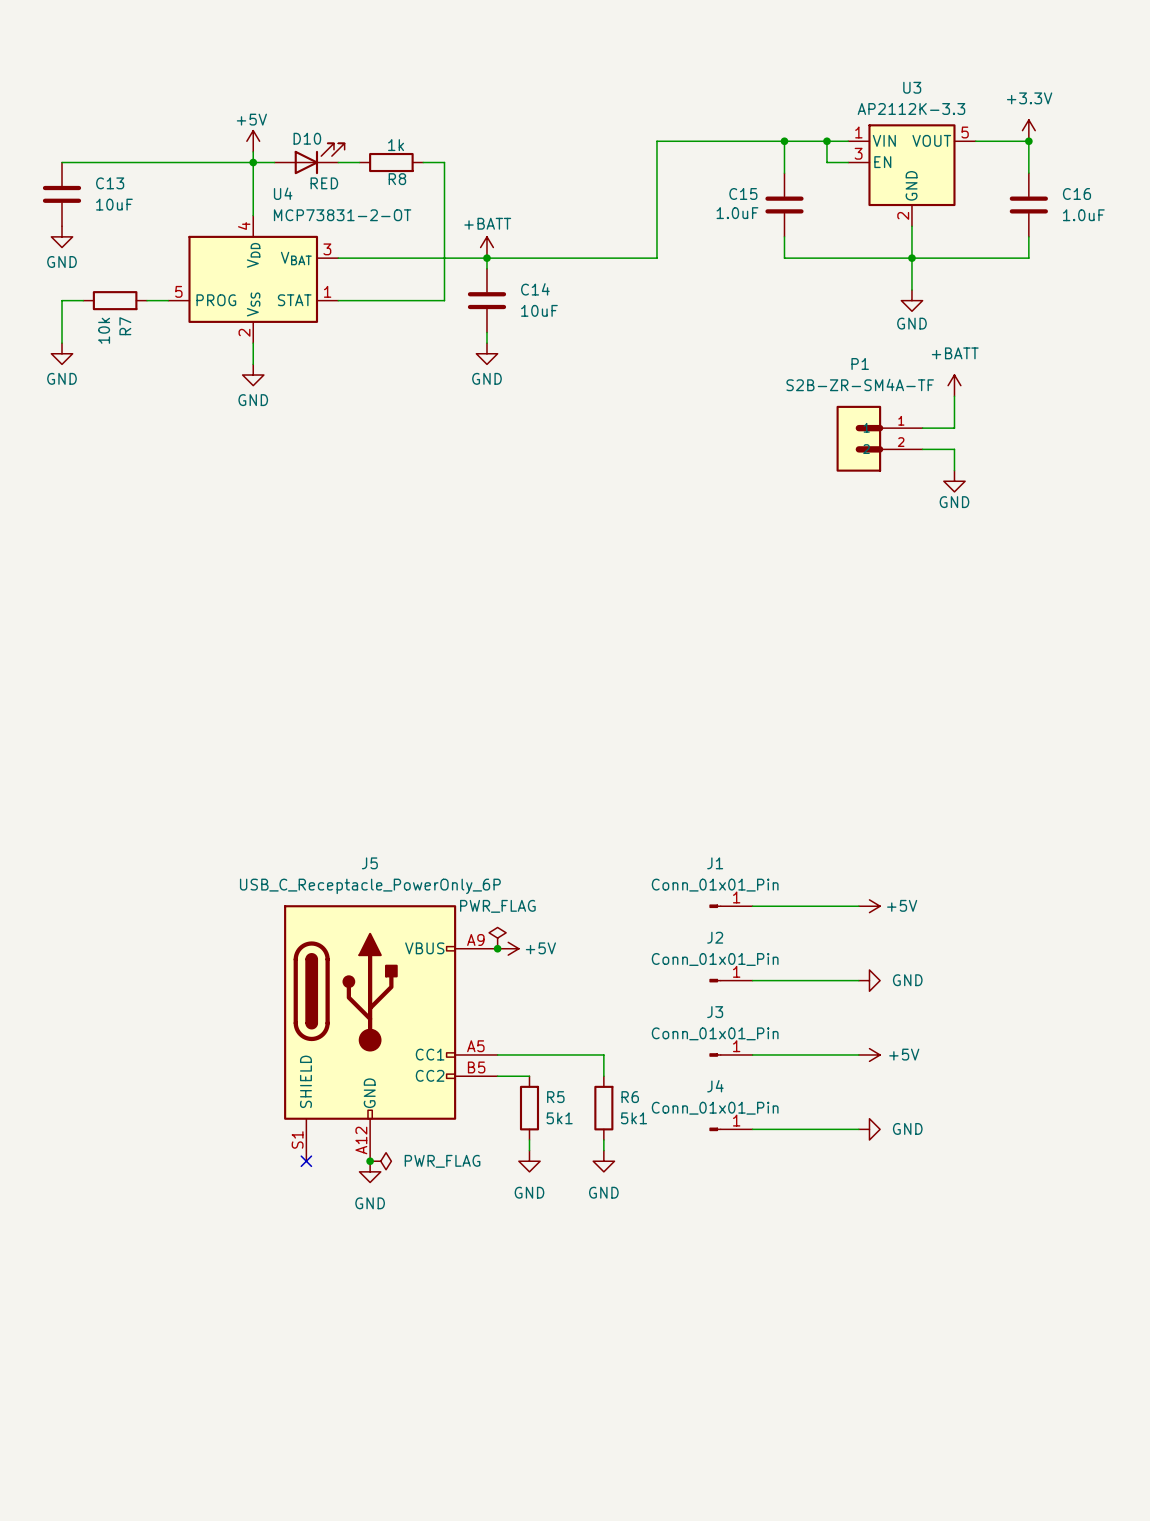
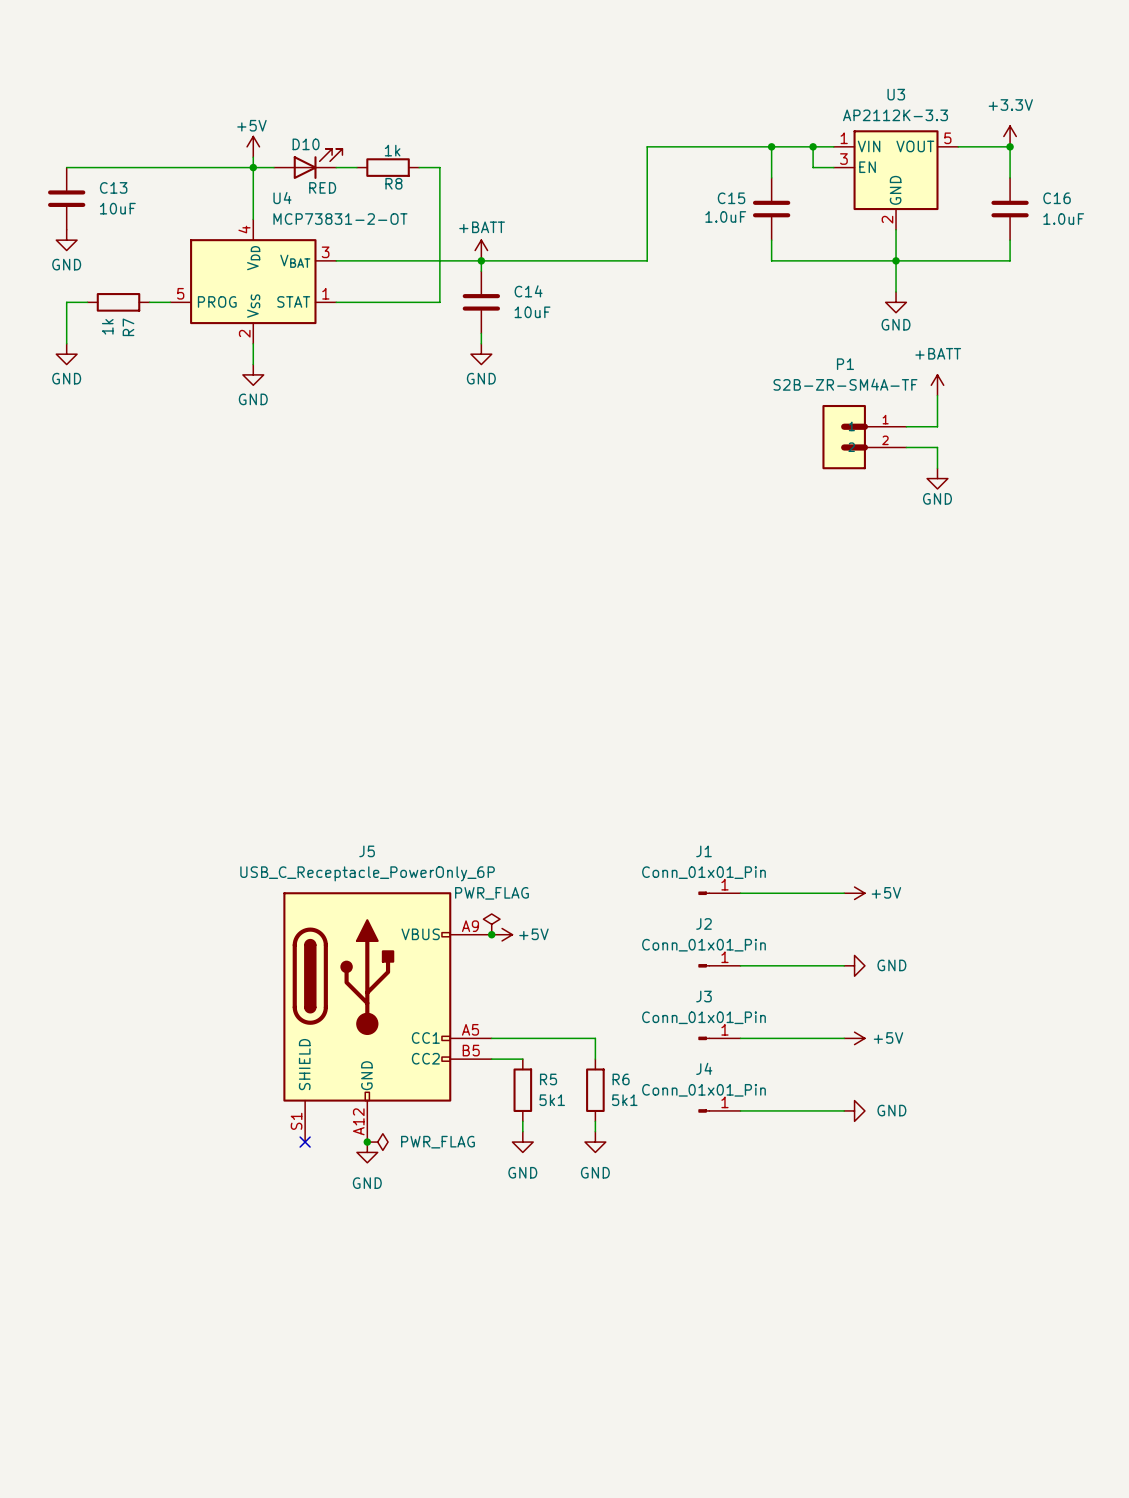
R7 value: 10k (104, 330) -> 1k (107, 326)

